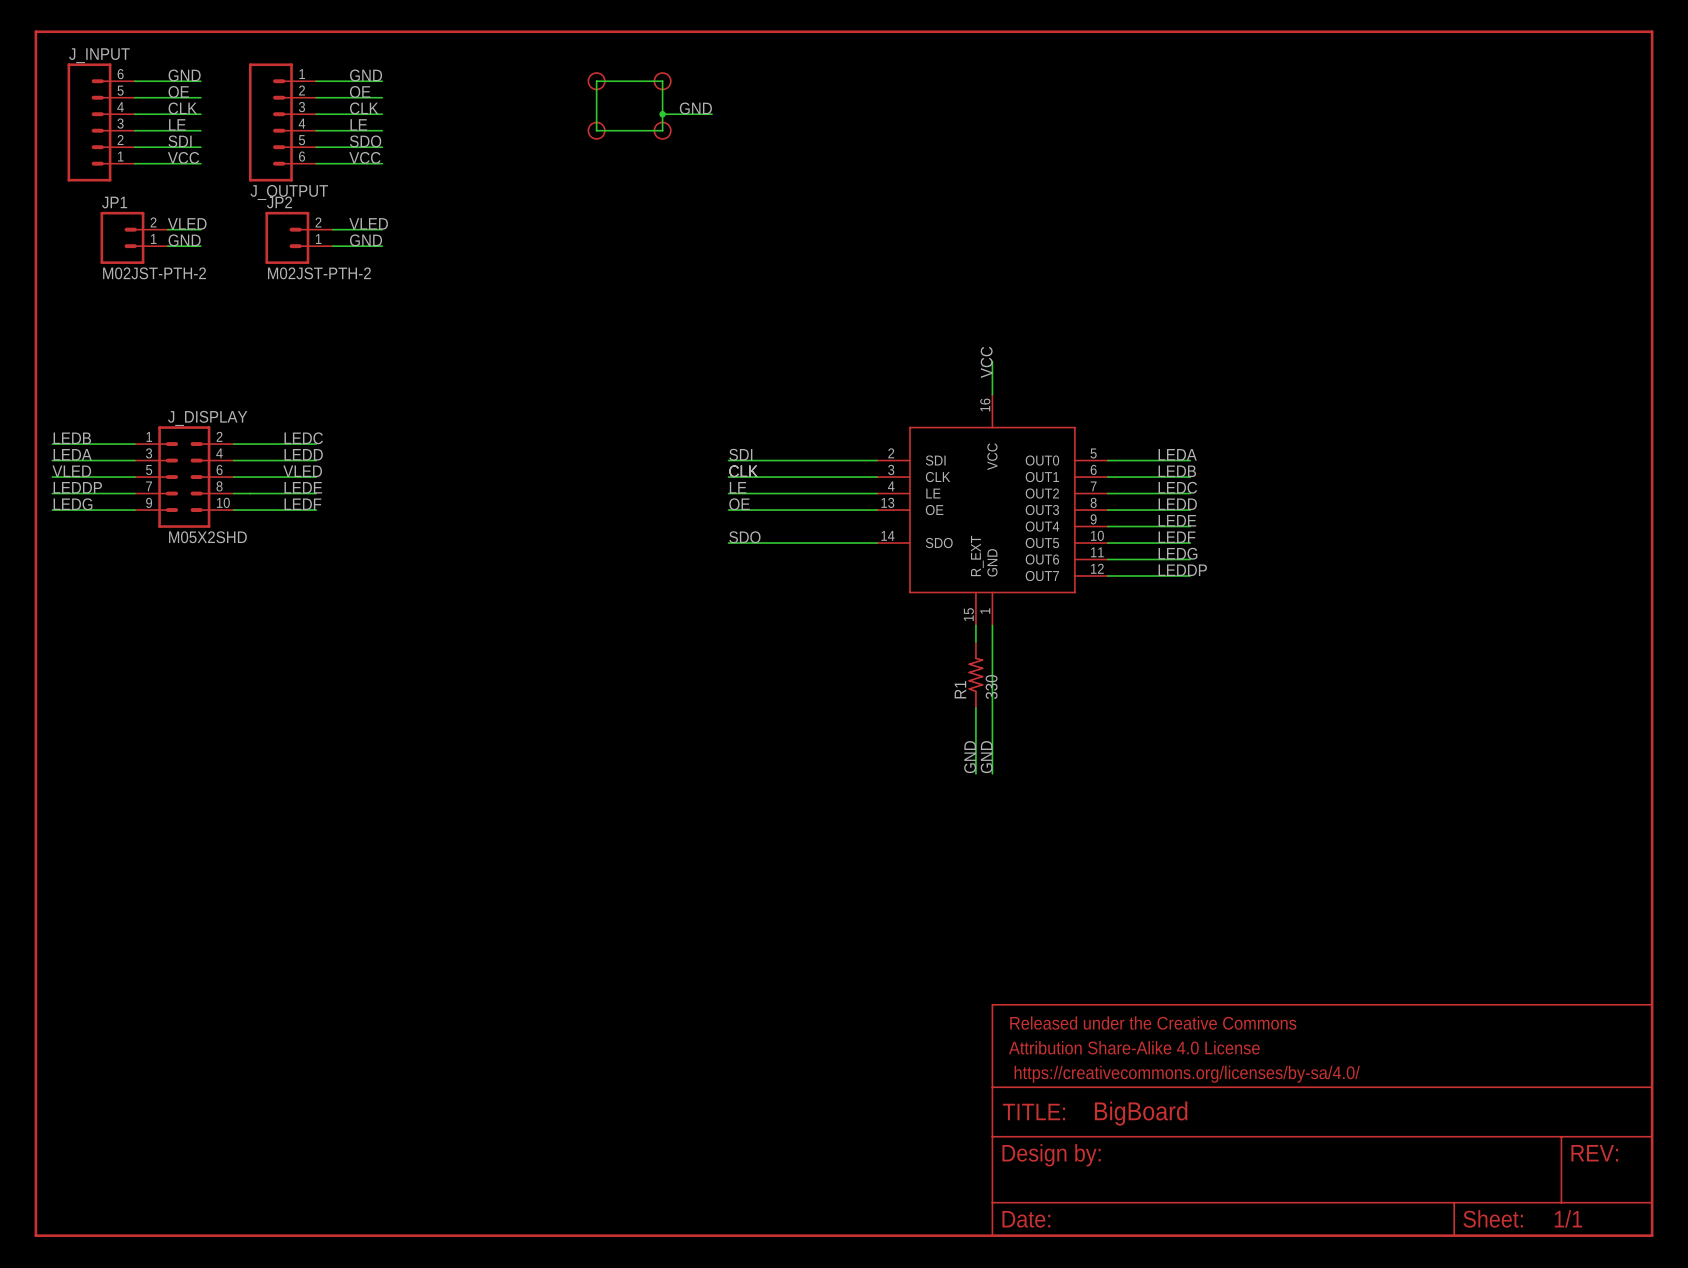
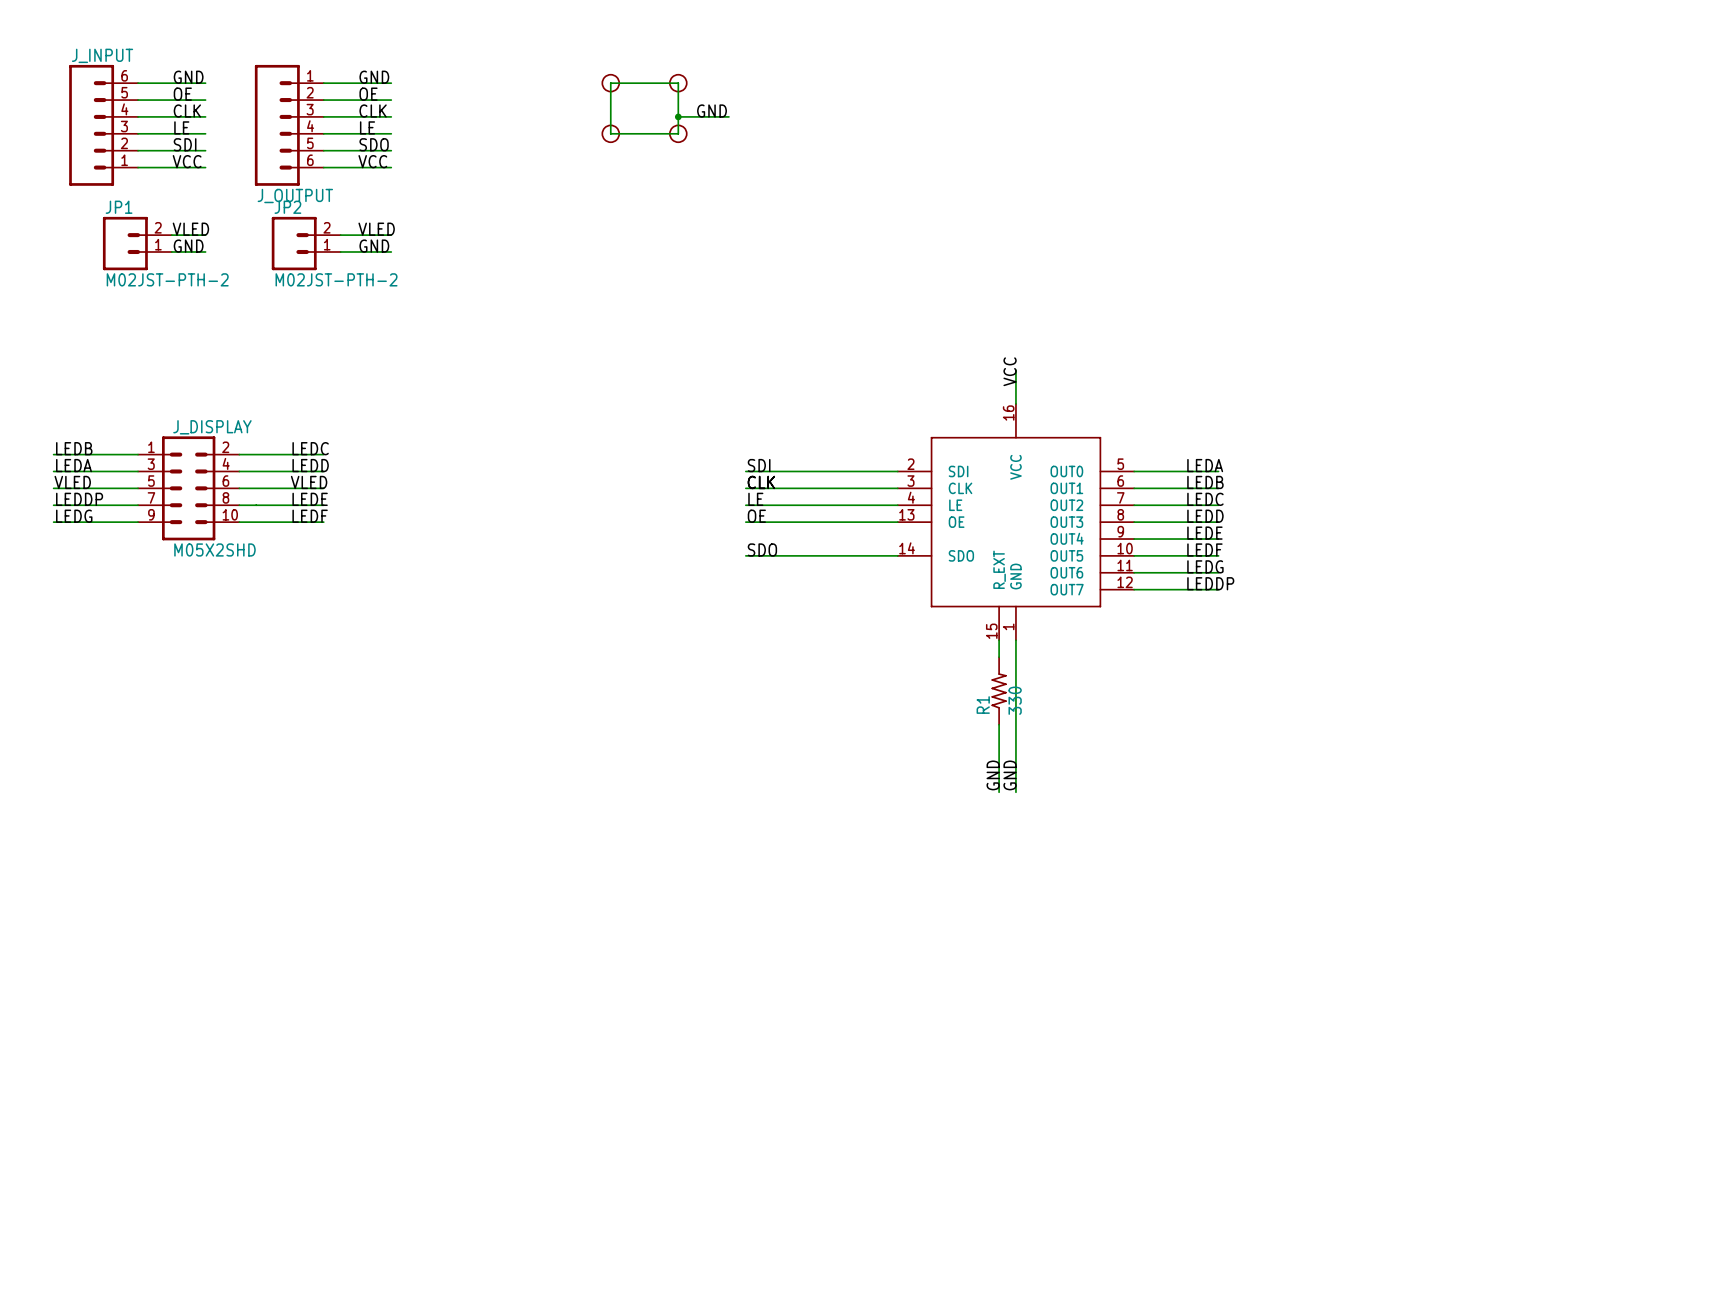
part: (844, 633) -> none
part: (1322, 1120) -> none

